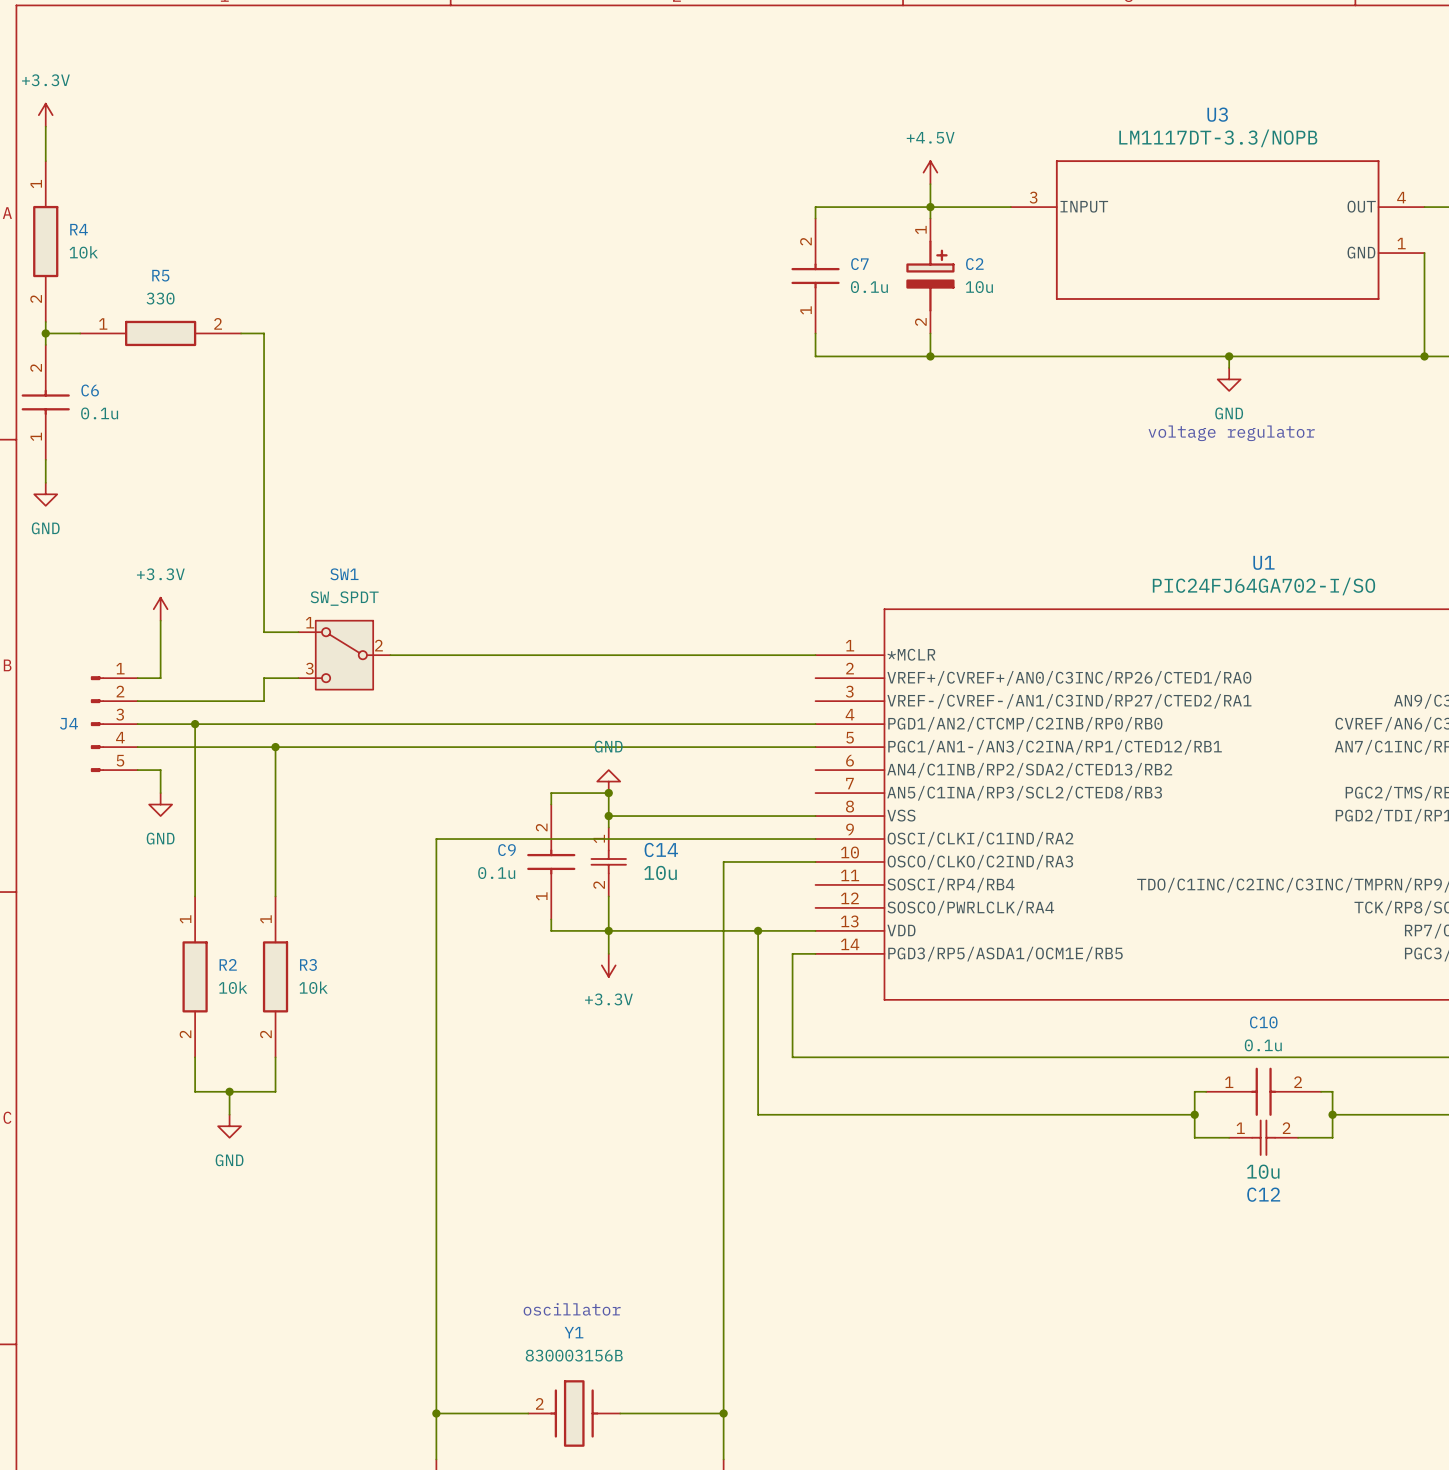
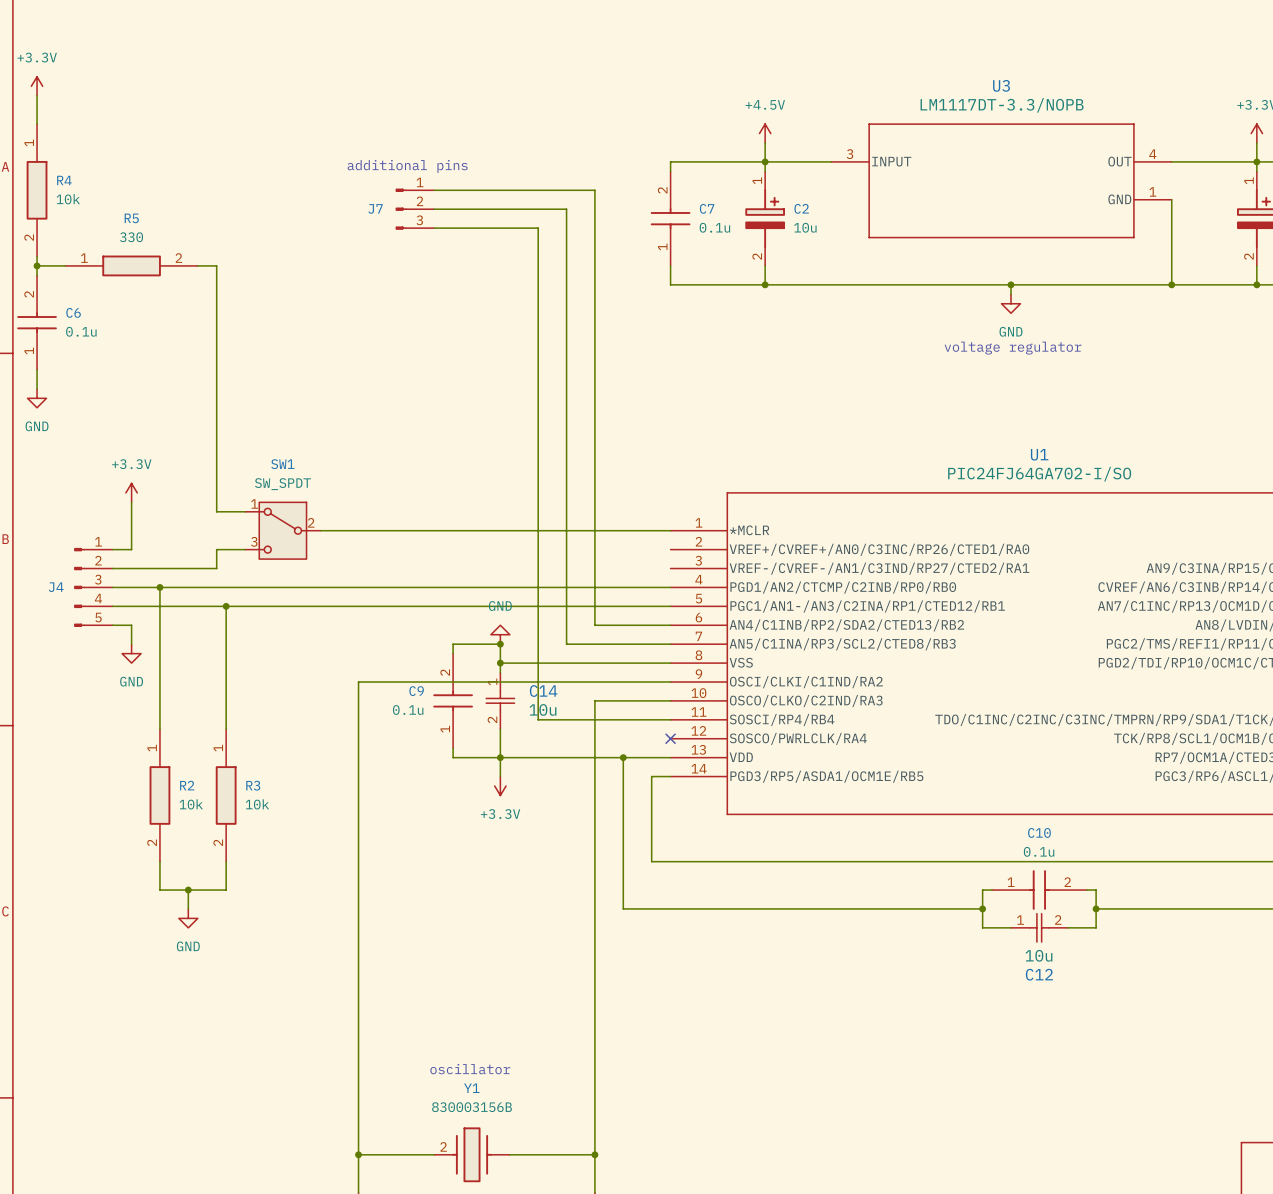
text: none -> additional pins (407, 166)
wire: none -> (434, 190) (594, 190) (594, 625) (670, 625)
J7: none -> (414, 209)
wire: none -> (434, 209) (566, 209) (566, 644) (670, 644)
wire: none -> (434, 228) (538, 228) (538, 719) (670, 719)
no-connect mark: none -> (670, 738)

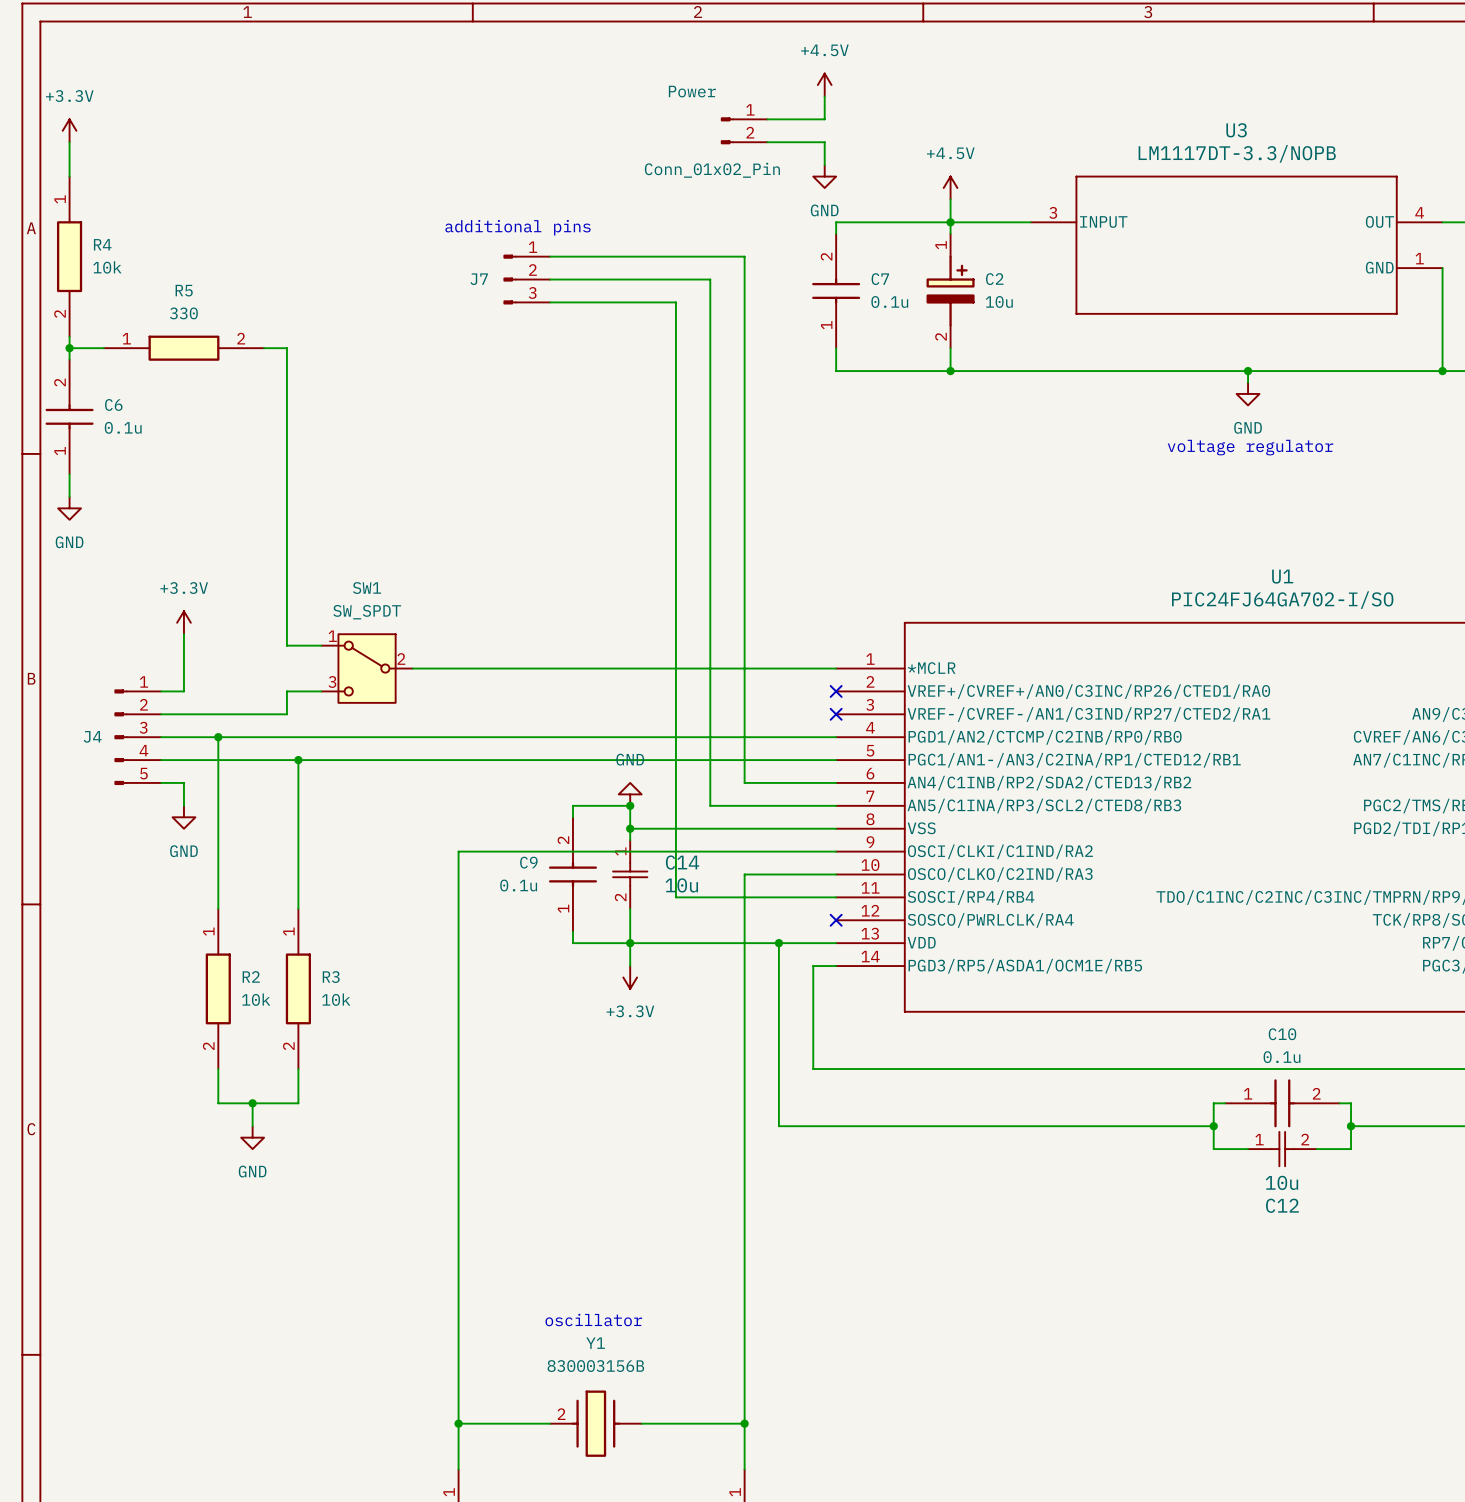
power symbol: none -> +4.5V (824, 85)
wire: none -> (824, 96) (824, 119) (767, 119)
Power: none -> Conn_01x02_Pin (744, 130)
wire: none -> (767, 142) (824, 142) (824, 165)
power symbol: none -> GND (824, 176)
no-connect mark: none -> (836, 691)
no-connect mark: none -> (836, 714)

